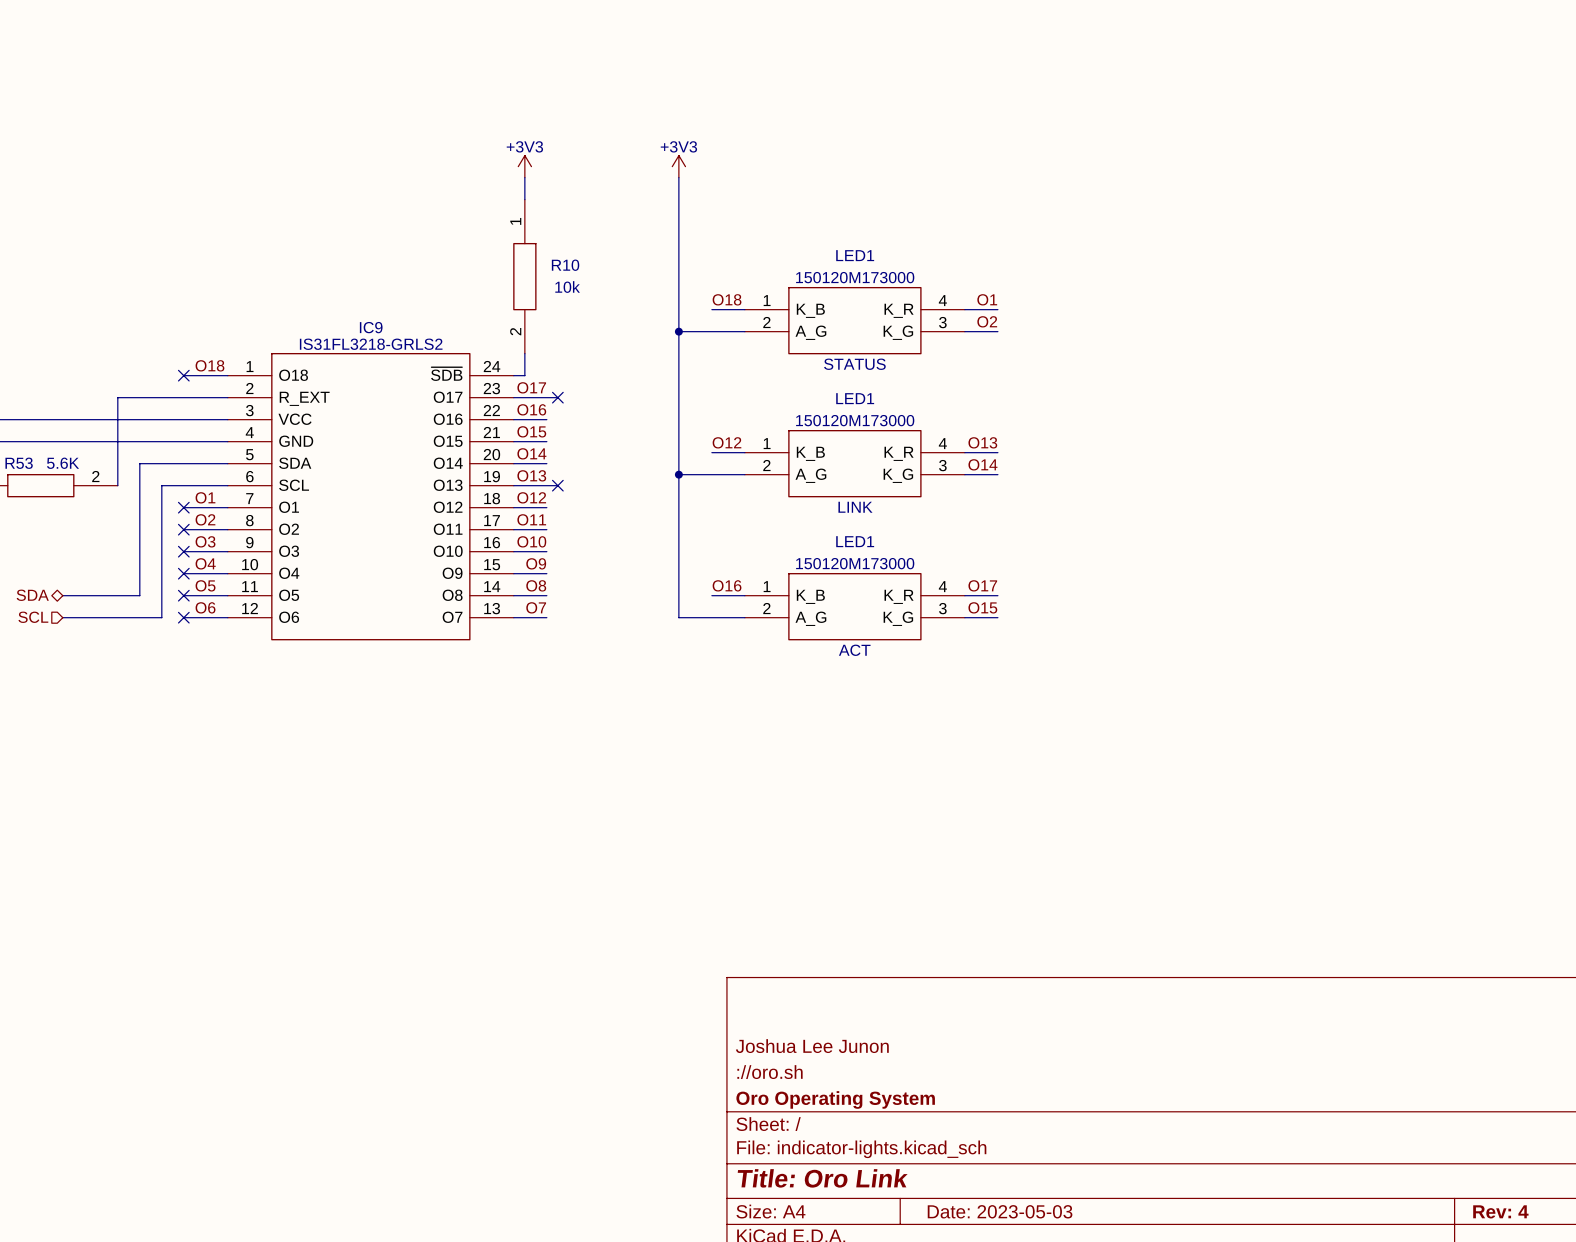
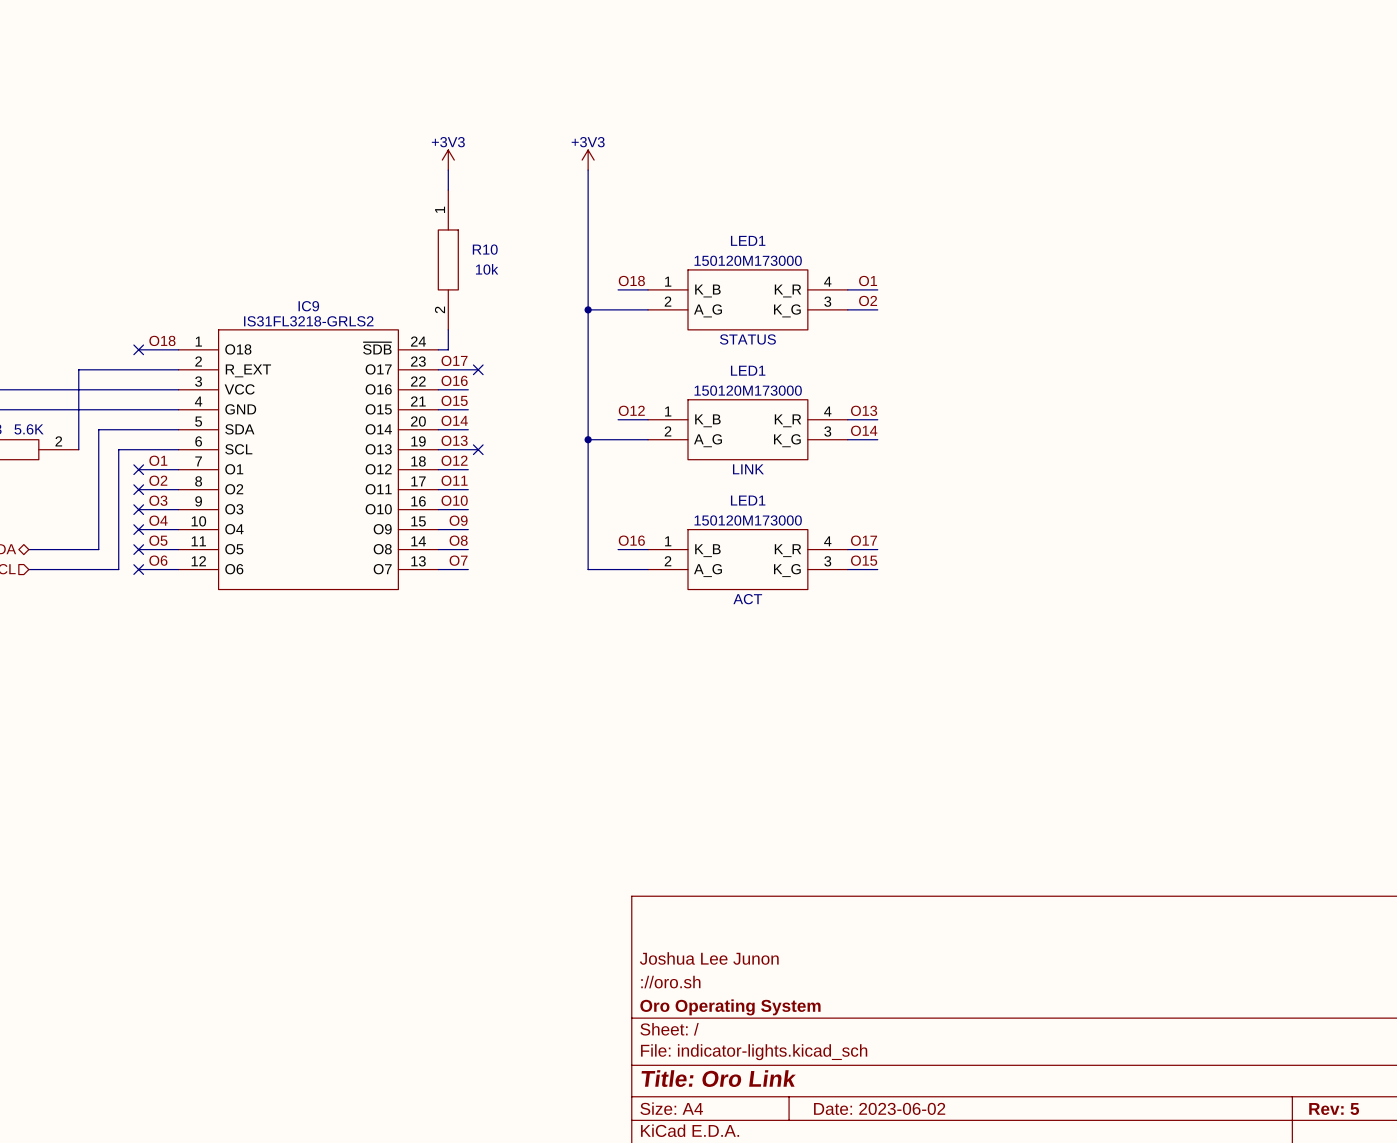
title block: Date: 2023-05-03 (1000, 1211) -> Date: 2023-06-02 (879, 1108)
title block: Rev: 4 (1500, 1211) -> Rev: 5 (1334, 1108)

